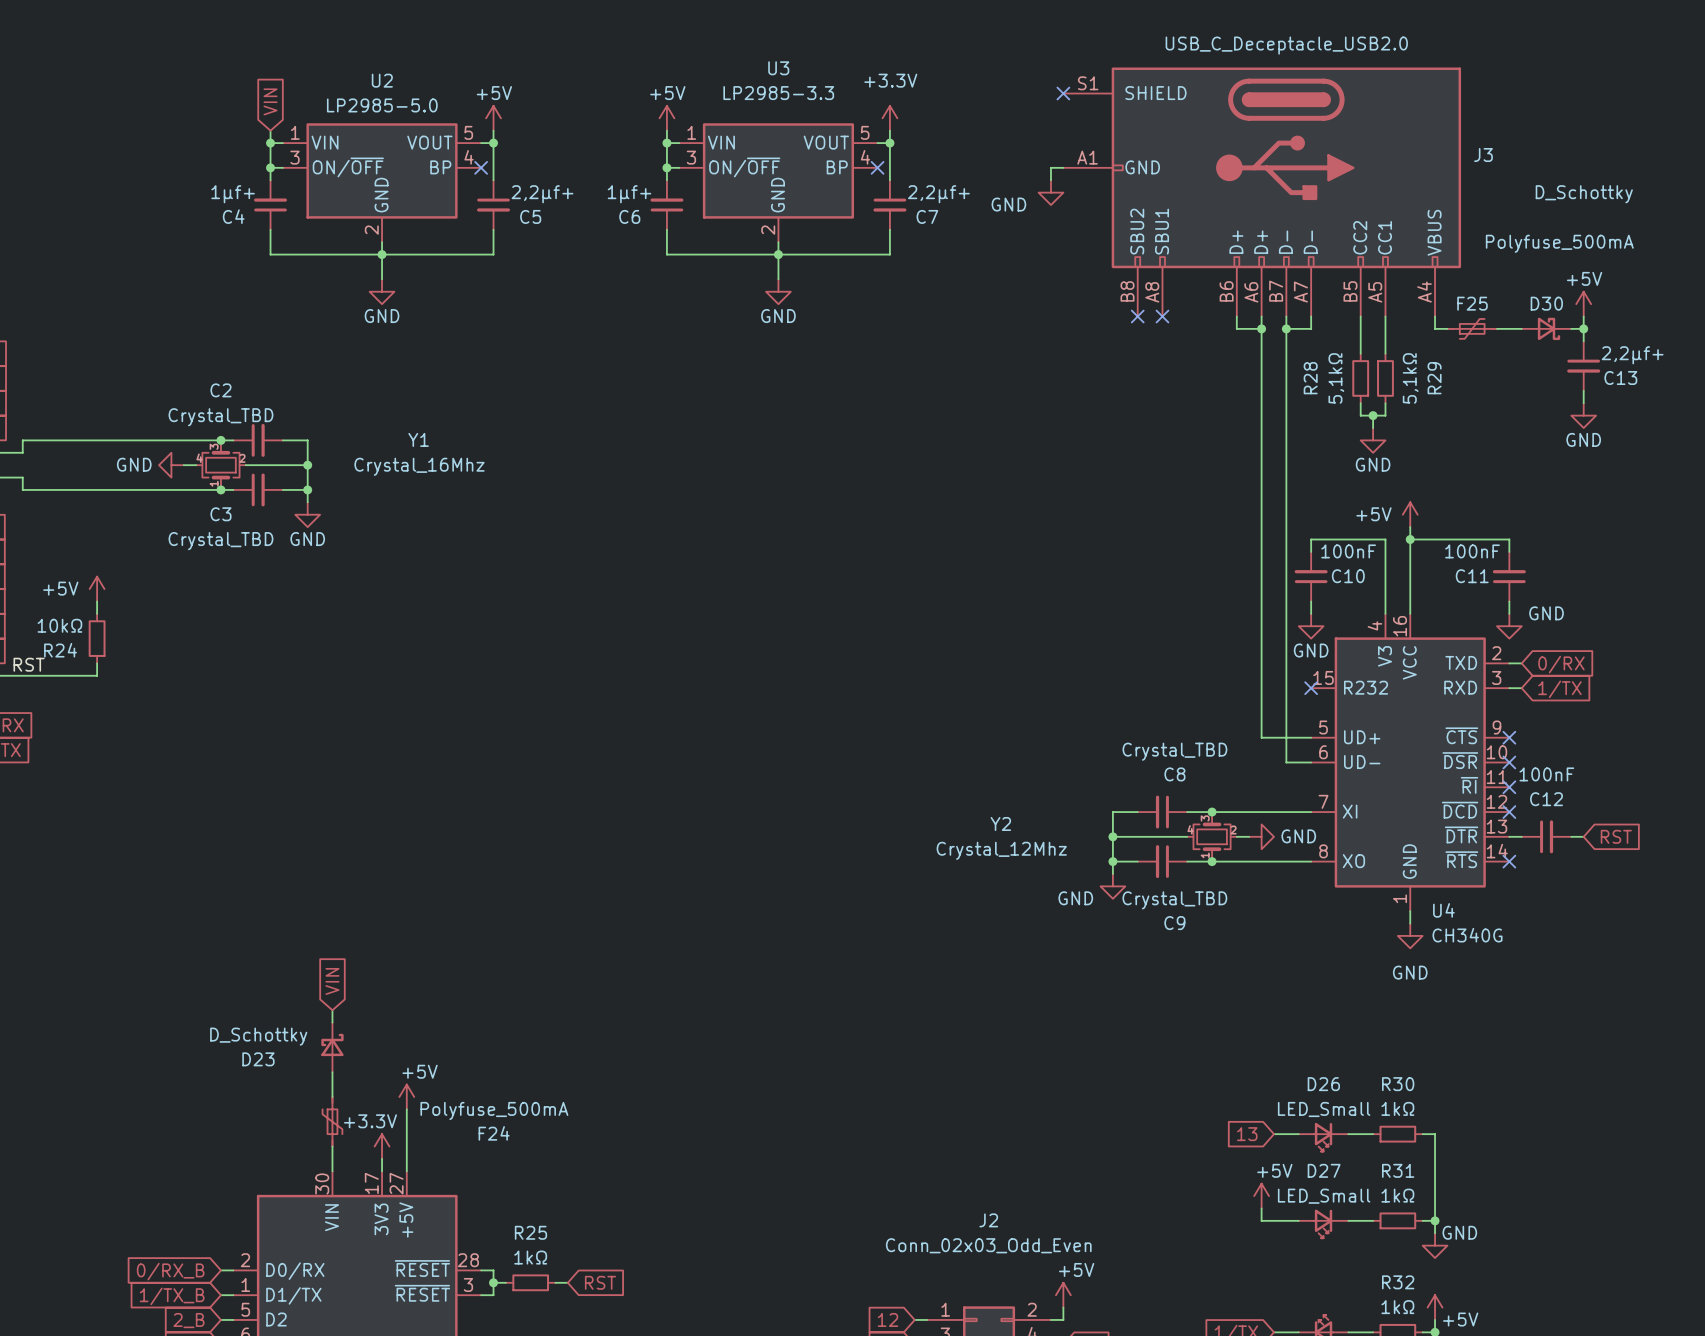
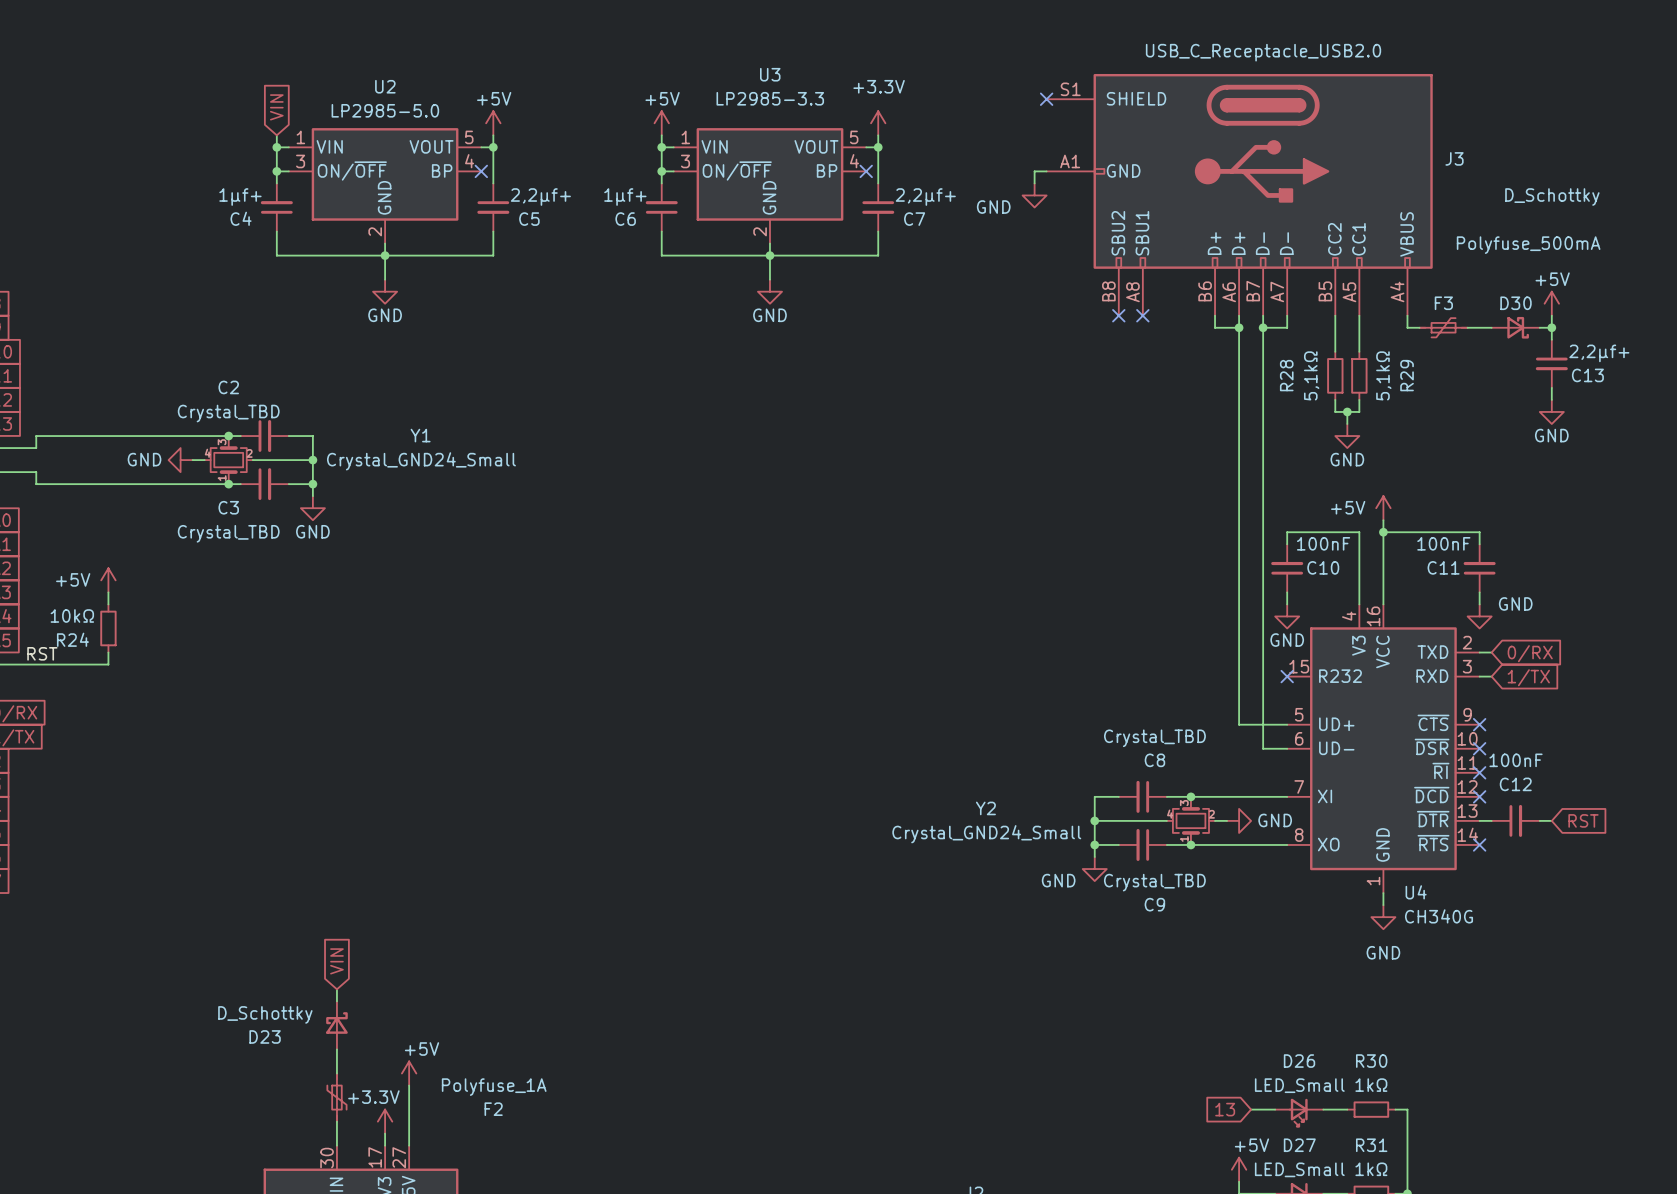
J3 value: USB_C_Deceptacle_USB2.0 (1286, 45) -> USB_C_Receptacle_USB2.0 (1263, 52)
F25 name: F25 (1472, 303) -> F3 (1443, 303)
Y1 value: Crystal_16Mhz (419, 466) -> Crystal_GND24_Small (421, 461)
Y2 value: Crystal_12Mhz (1001, 850) -> Crystal_GND24_Small (986, 834)
F24 value: Polyfuse_500mA (494, 1110) -> Polyfuse_1A (494, 1087)
F24 name: F24 (494, 1133) -> F2 (493, 1109)

